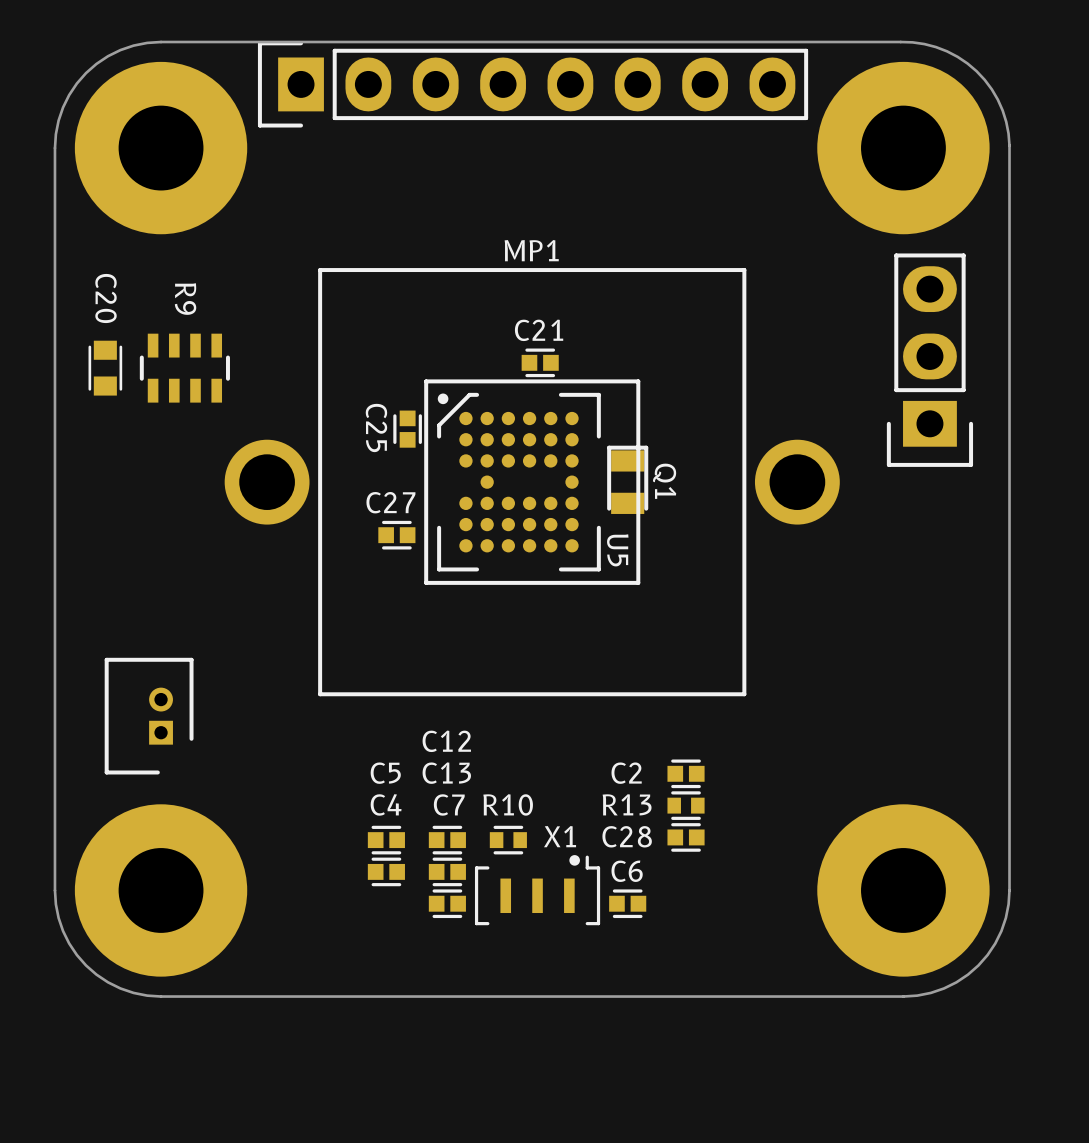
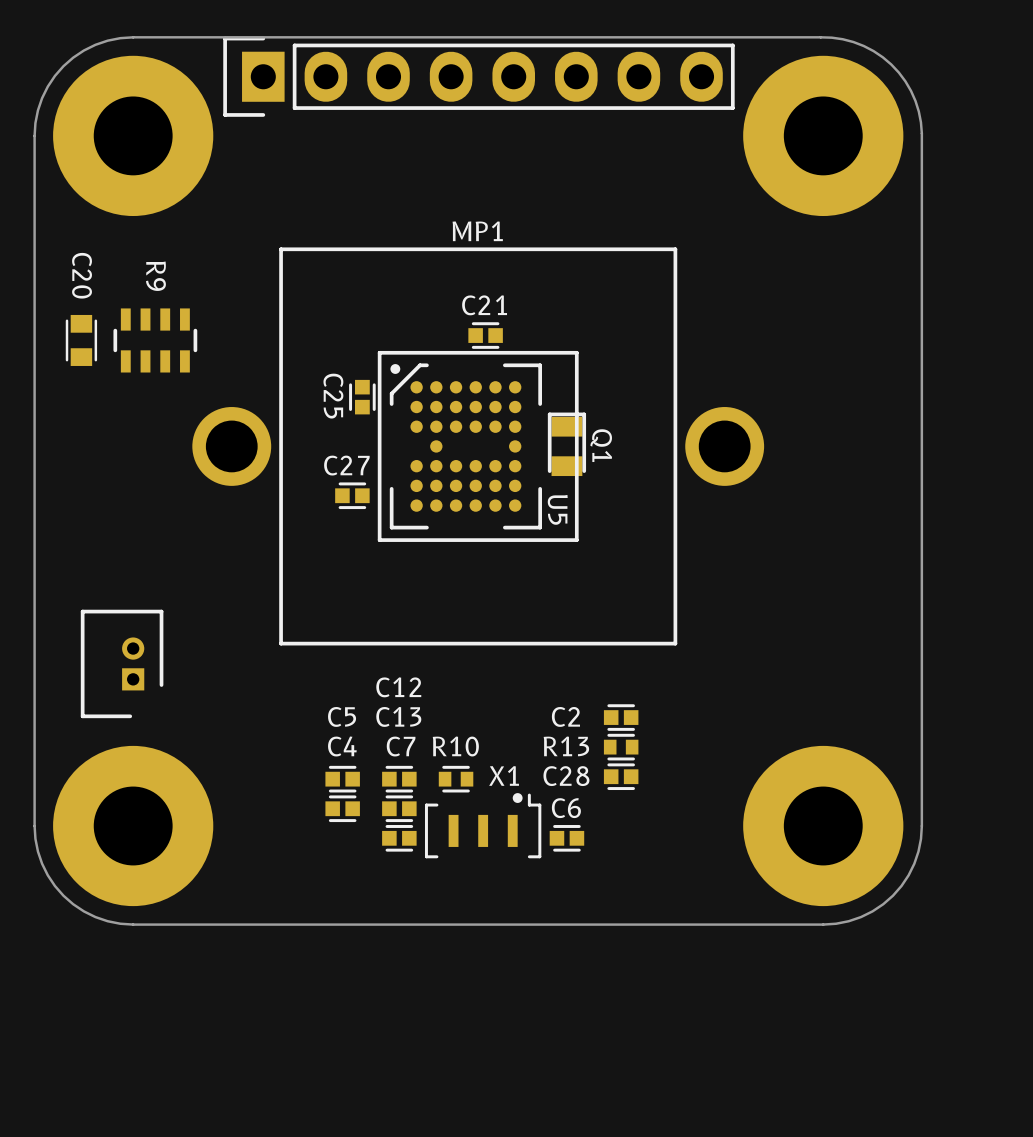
part: (929, 360) -> none

